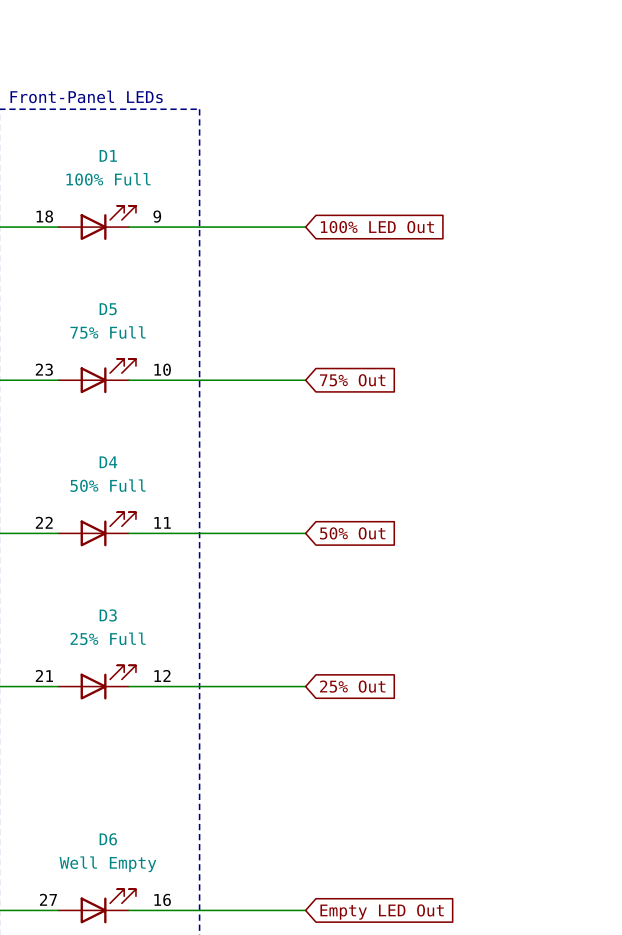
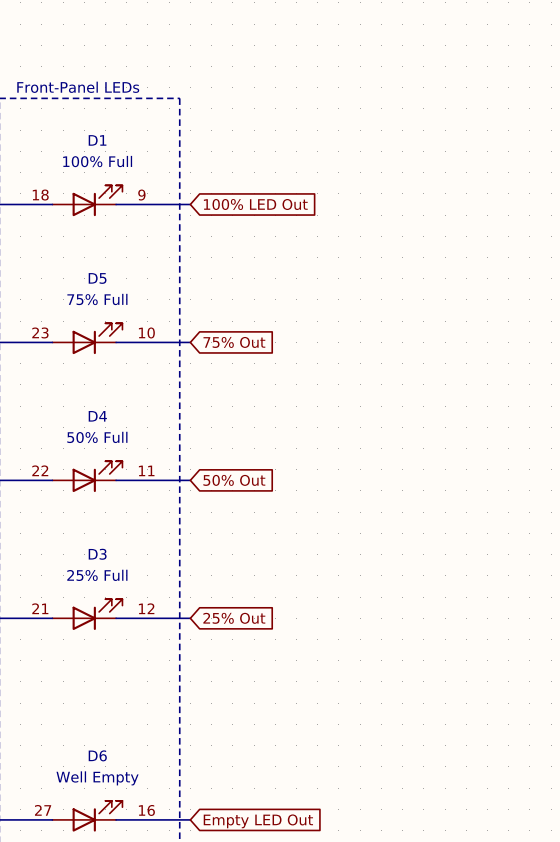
wire: (211, 227) (305, 227) -> none
global label position: 100% LED Out (377, 227) -> 100% LED Out (255, 204)
wire: (211, 380) (305, 380) -> none
global label position: 75% Out (352, 380) -> 75% Out (234, 342)
wire: (211, 533) (305, 533) -> none
global label position: 50% Out (352, 533) -> 50% Out (234, 480)
wire: (211, 686) (305, 686) -> none
global label position: 25% Out (352, 686) -> 25% Out (234, 618)
wire: (211, 910) (305, 910) -> none
global label position: Empty LED Out (382, 912) -> Empty LED Out (258, 821)

